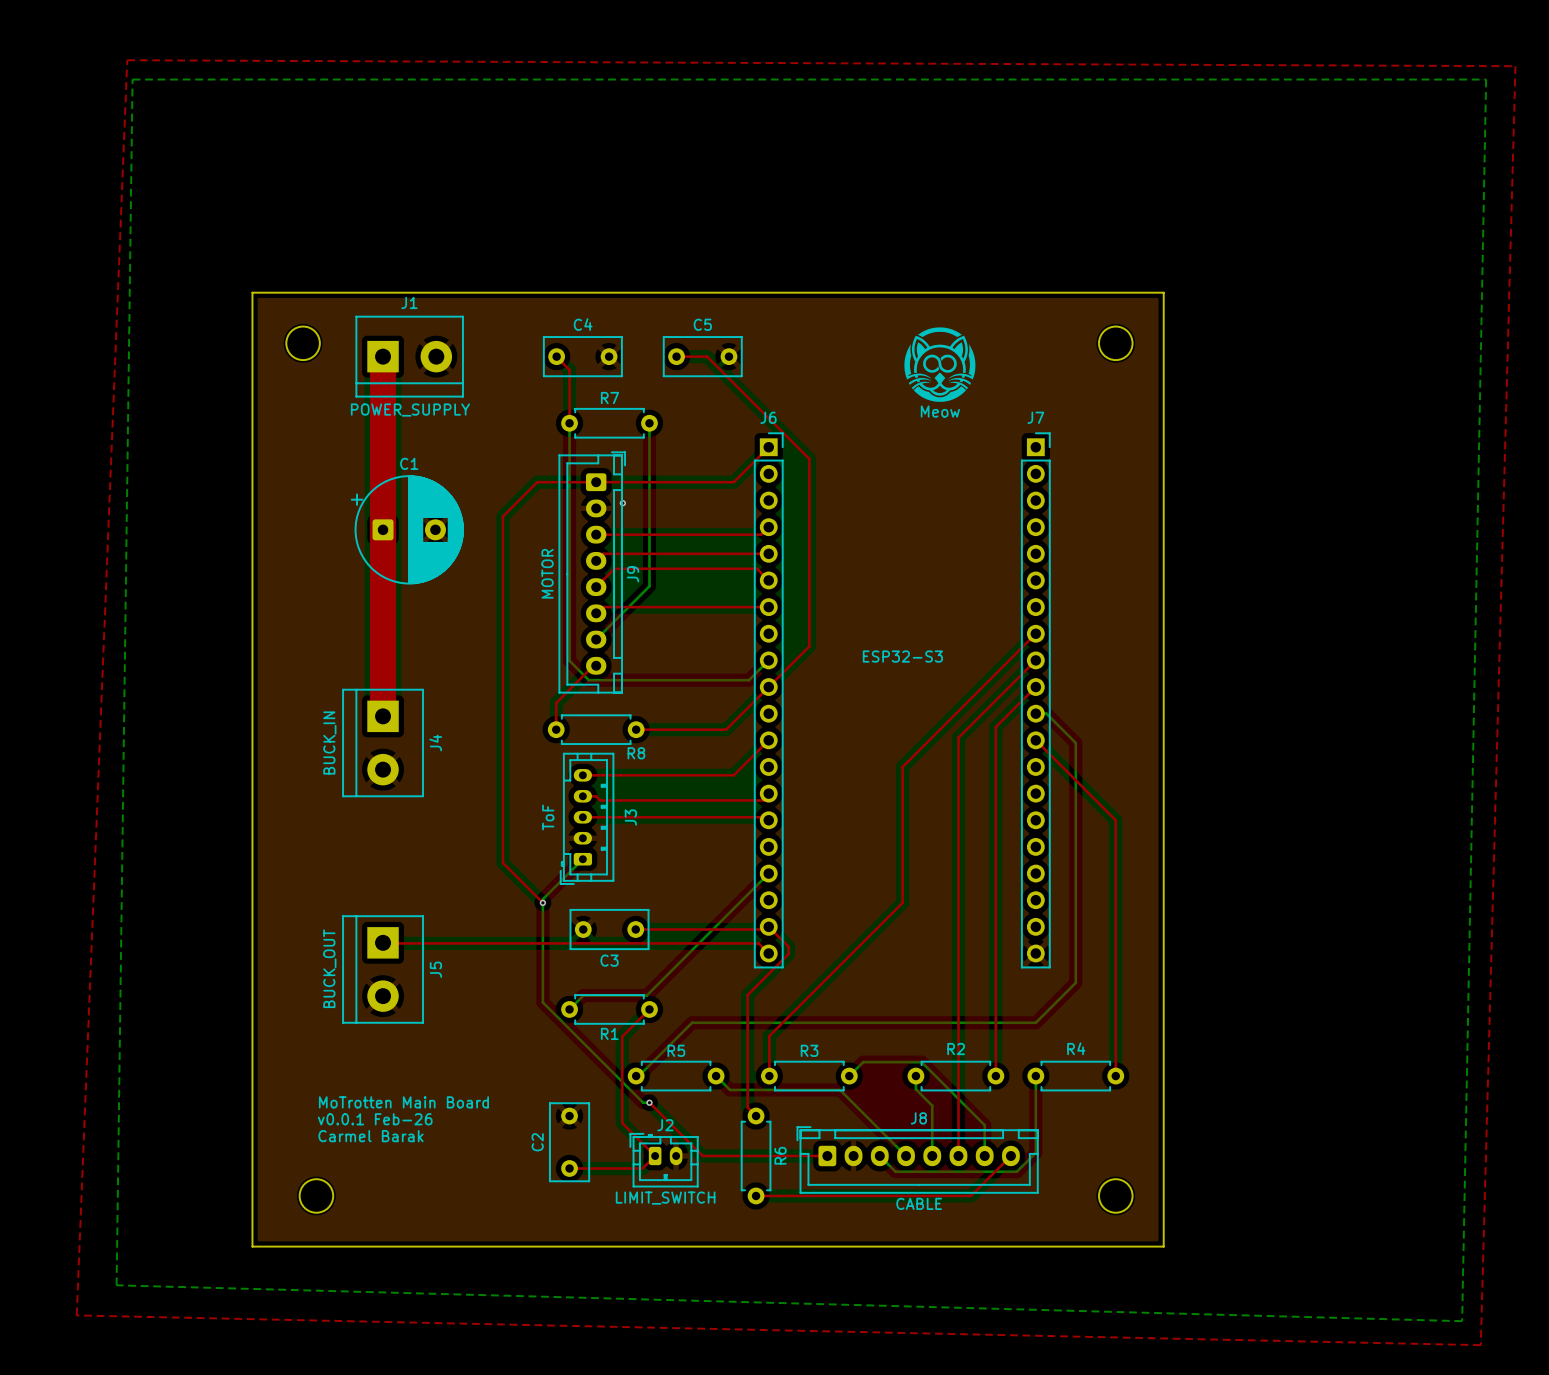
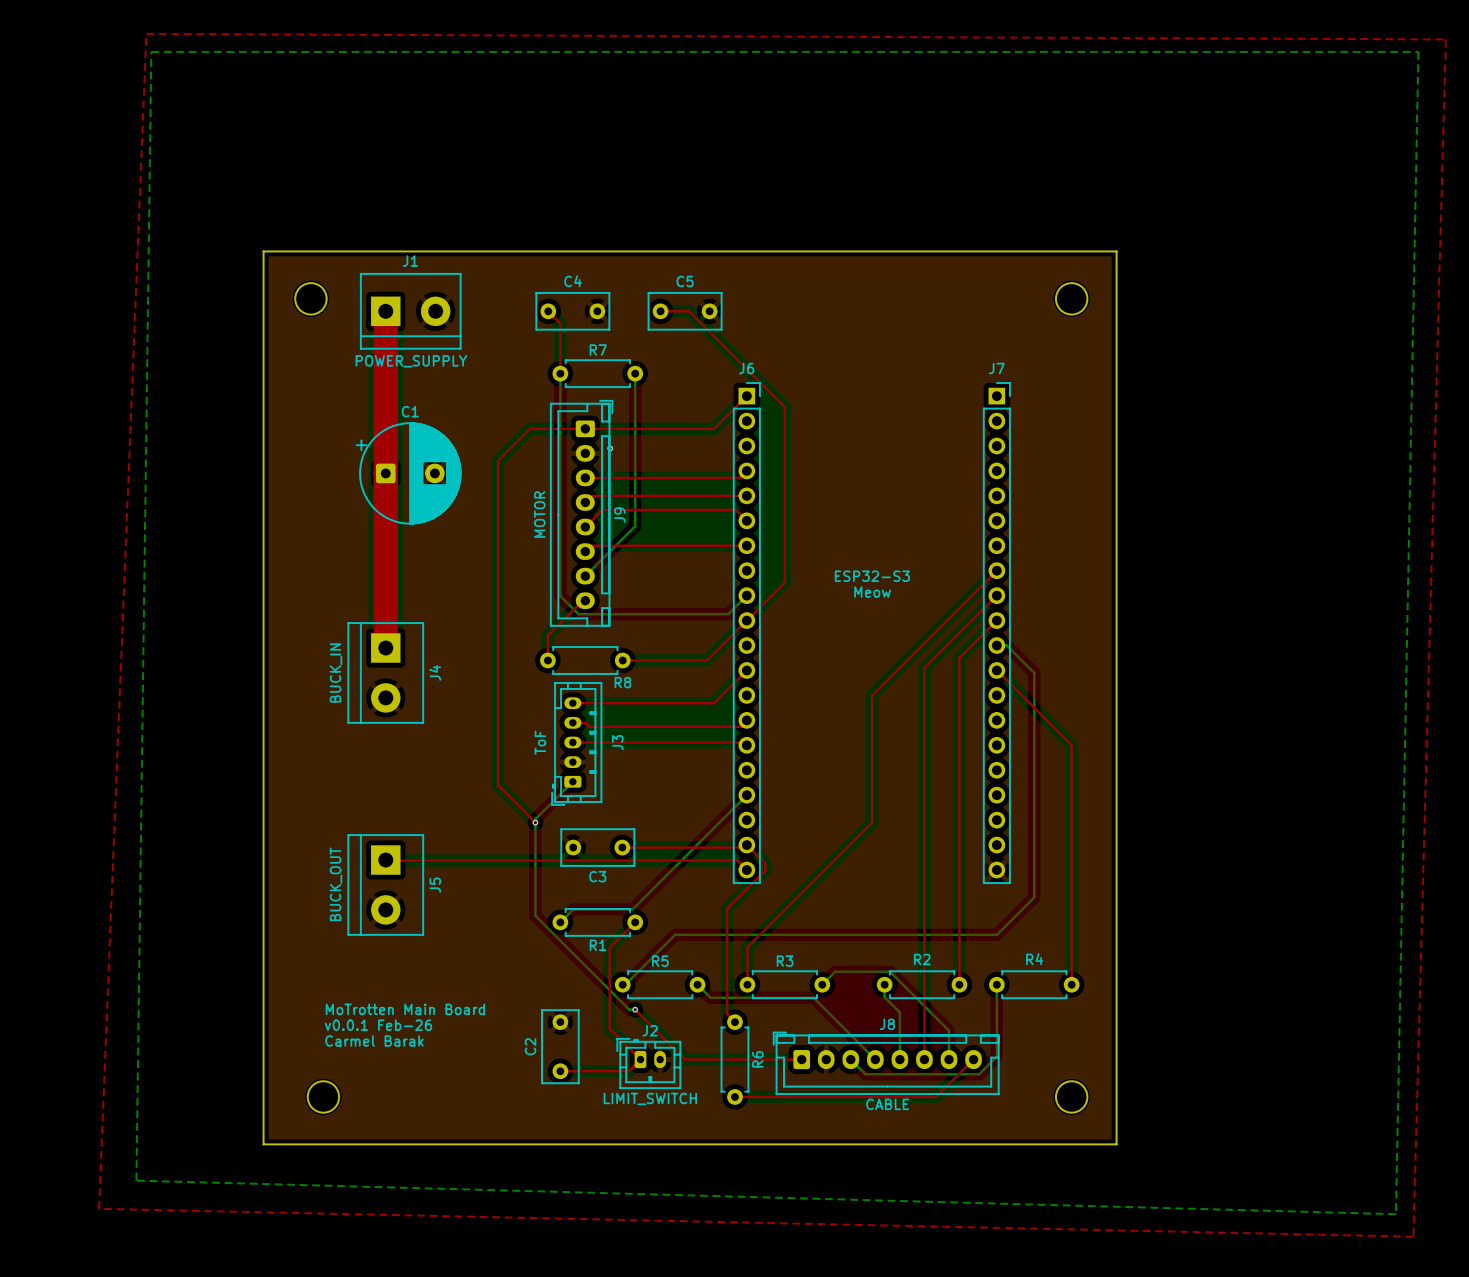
drawing: [904, 327, 976, 402] -> none
text: Meow (940, 411) -> none
text: none -> ESP32-S3 (872, 576)
text: ESP32-S3 (902, 656) -> Meow (872, 592)

